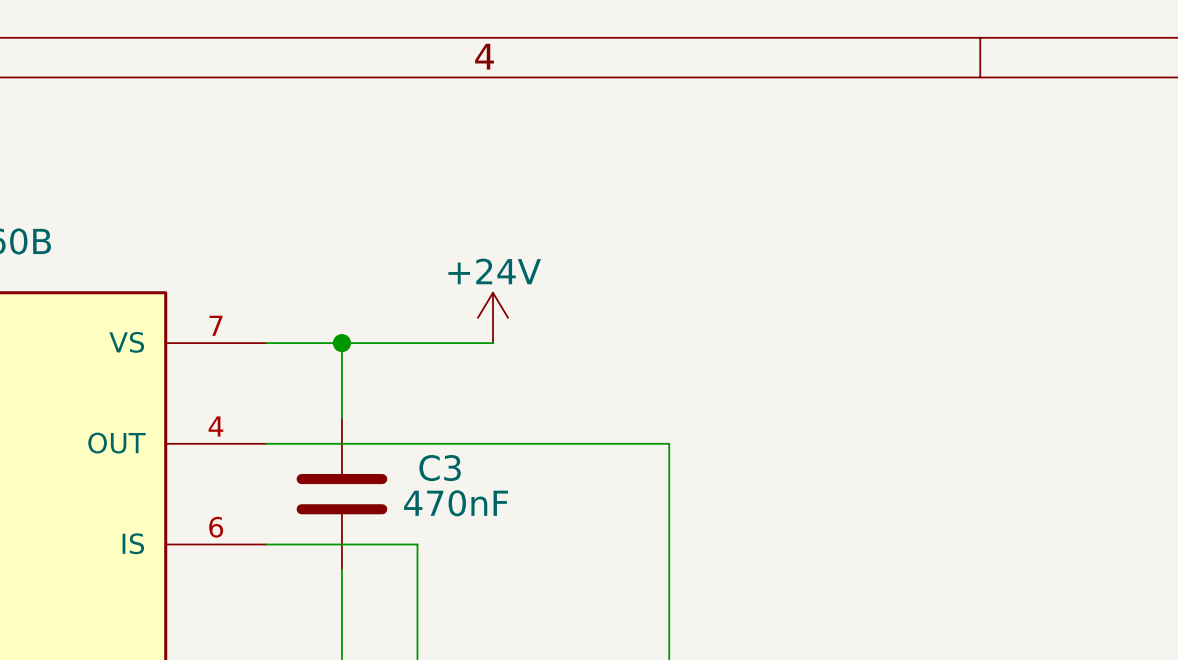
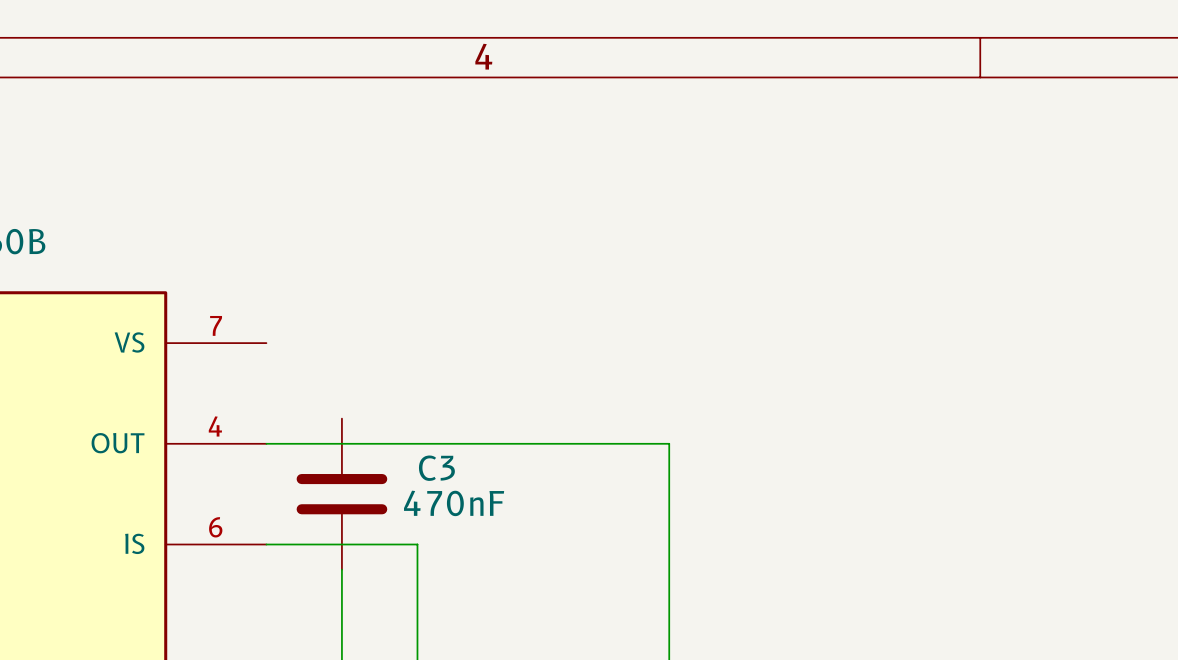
power symbol: +24V (493, 317) -> none
wire: (266, 343) (493, 343) -> none
wire: (341, 343) (341, 418) -> none
junction: (341, 343) -> none

